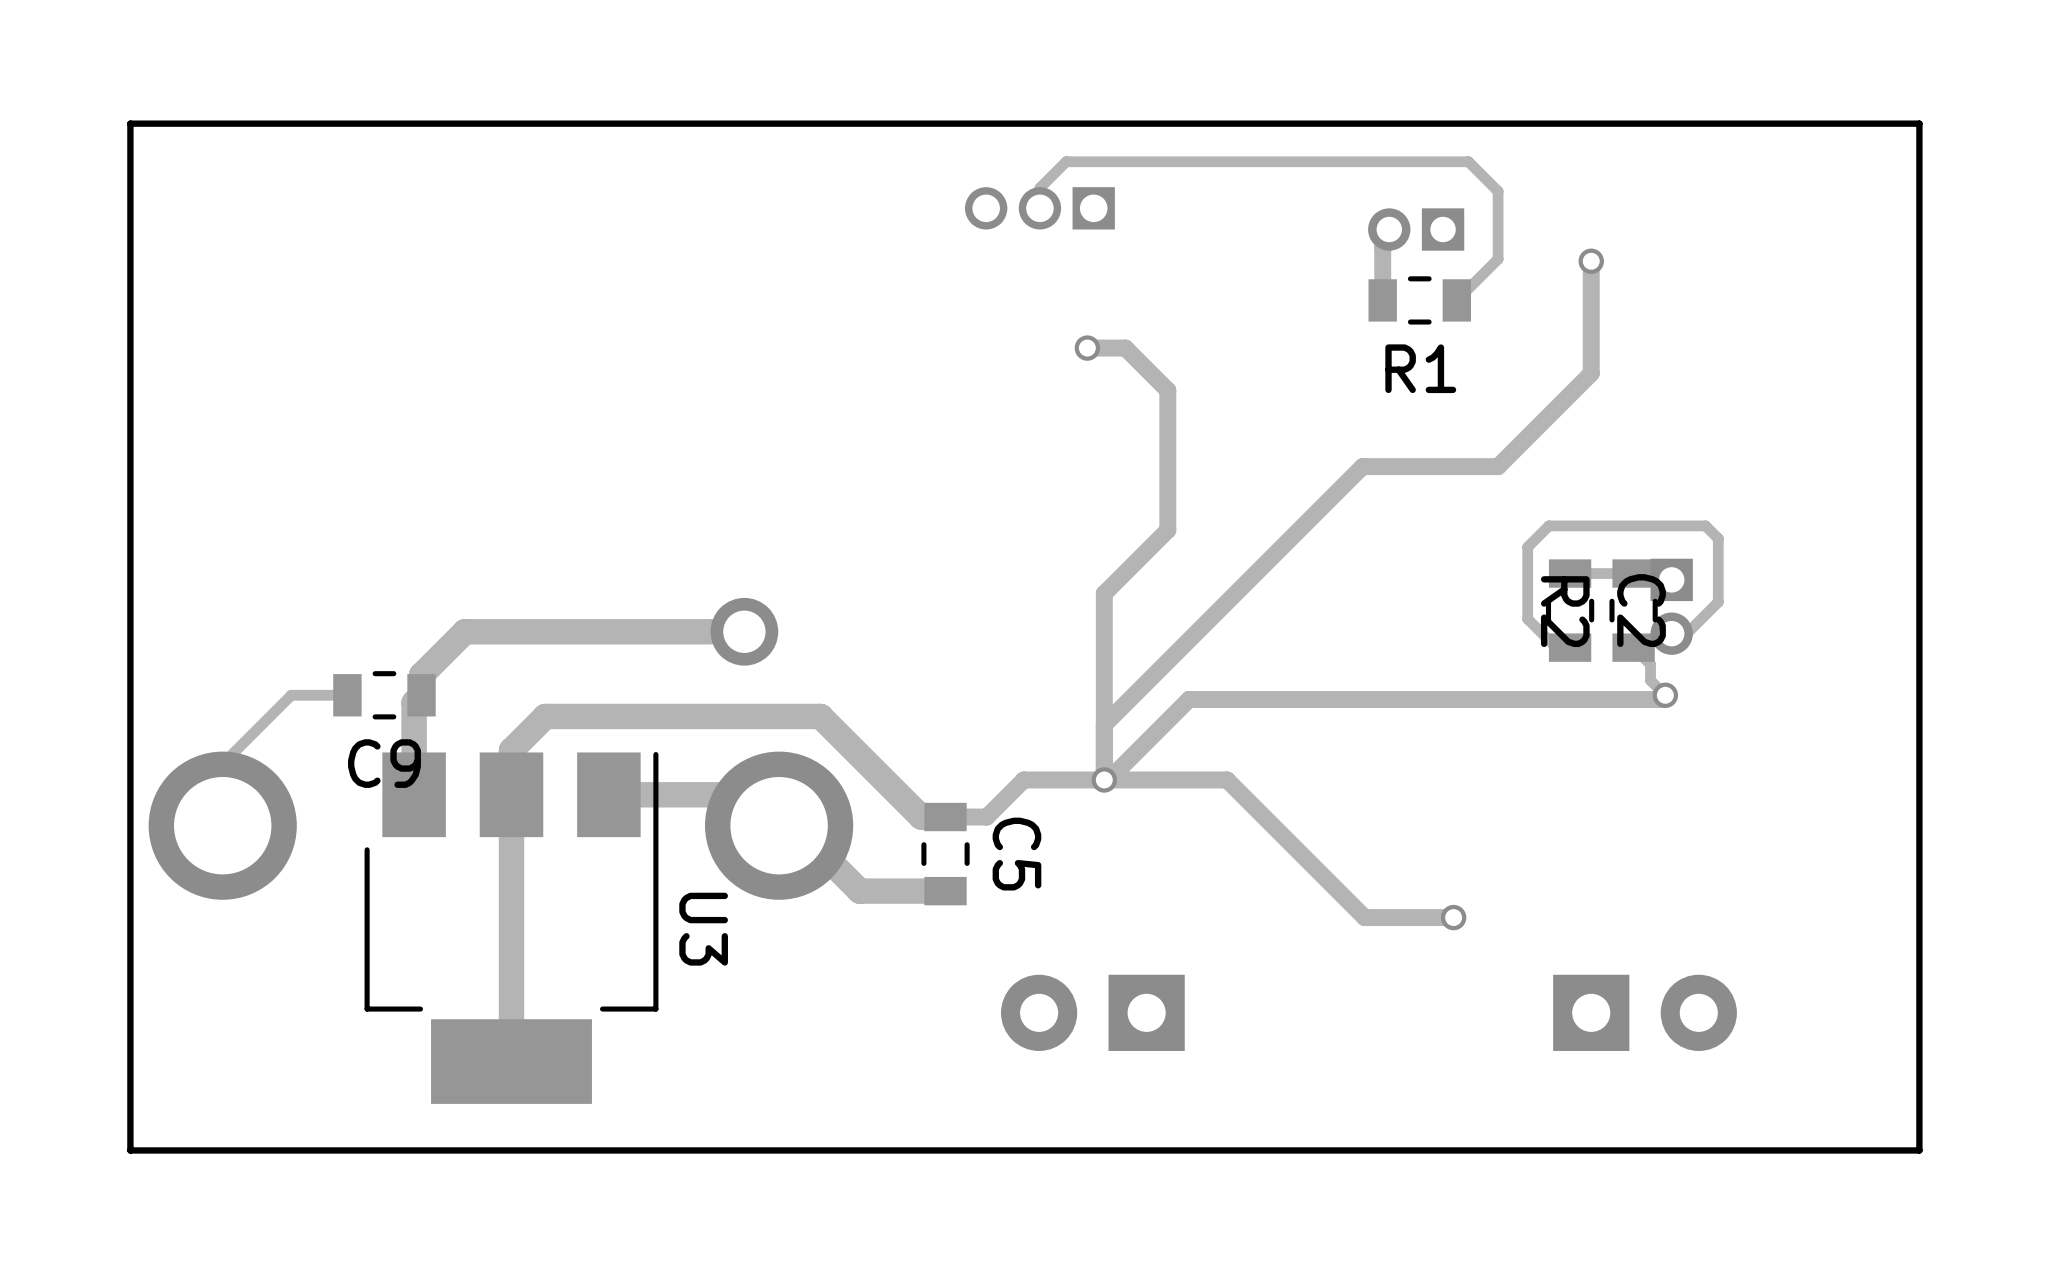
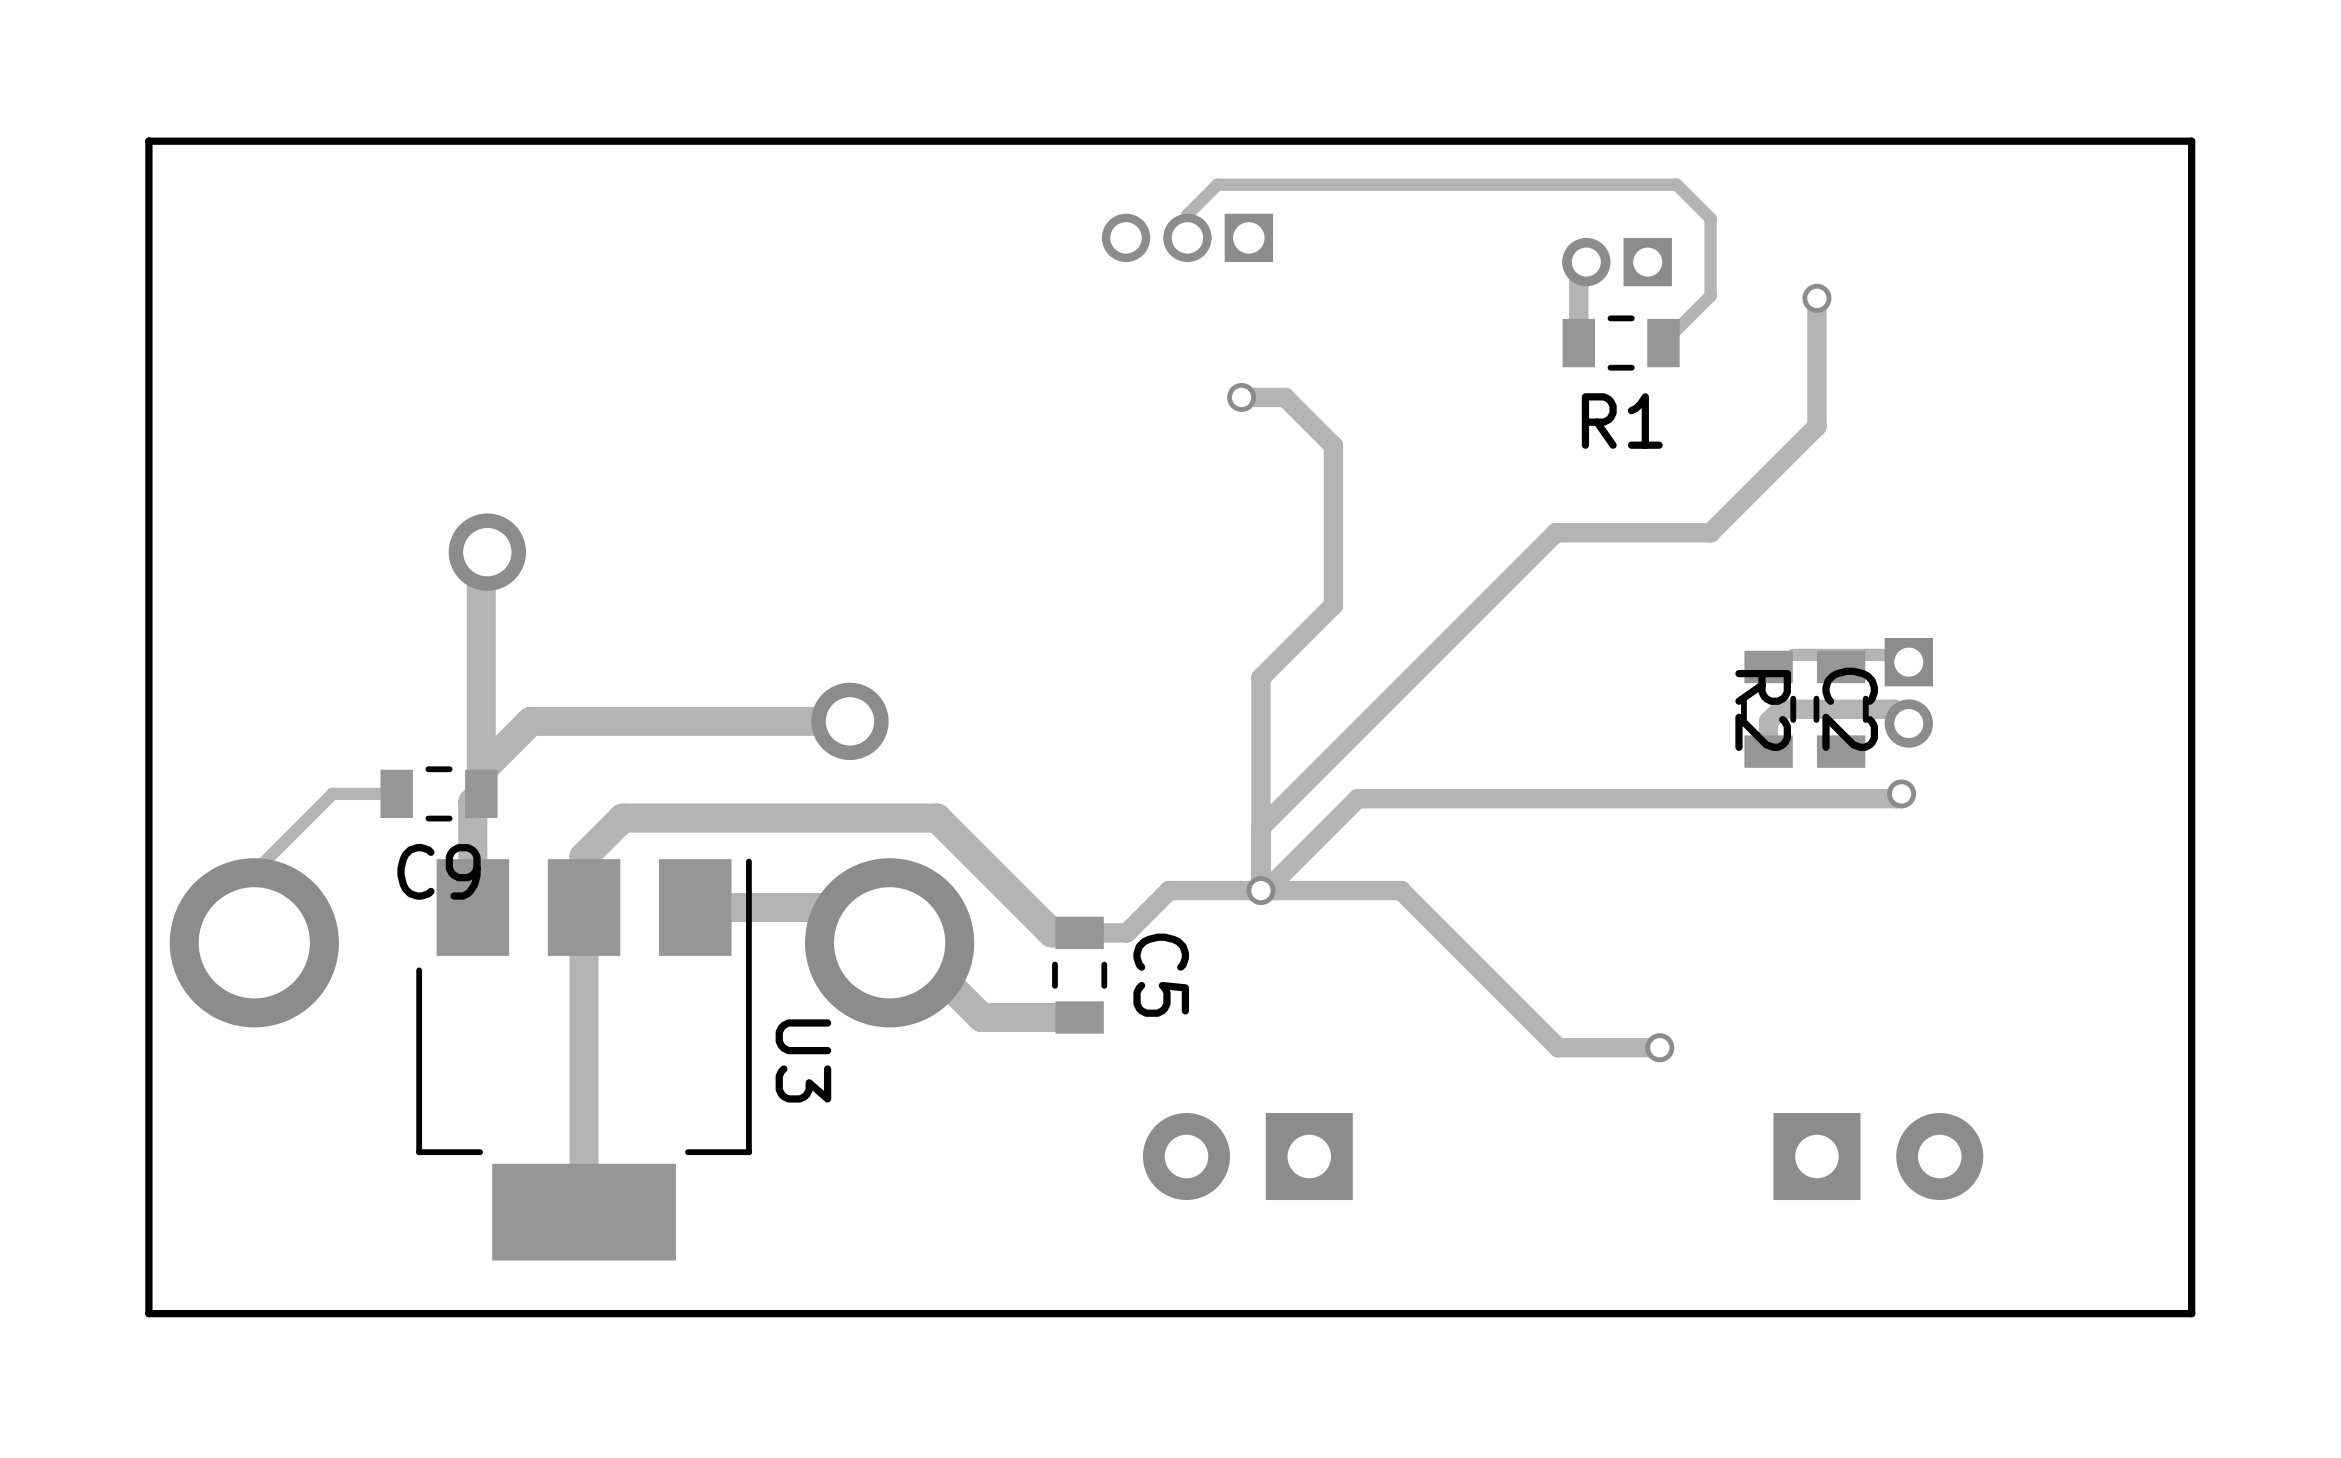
track: none -> (487, 552) (481, 558) (481, 770)
via: none -> (487, 552)
C2 position: (1570, 610) -> (1768, 709)
R2 position: (1633, 610) -> (1841, 709)
track: (1671, 633) (1686, 633) (1718, 602) (1718, 538) (1705, 525) (1548, 525) (1527, 547) (1527, 619) (1556, 647) (1570, 647) -> (1908, 723) (1894, 709) (1780, 709) (1768, 721) (1768, 751)
track: (1633, 647) (1650, 664) (1650, 680) (1665, 695) -> none

